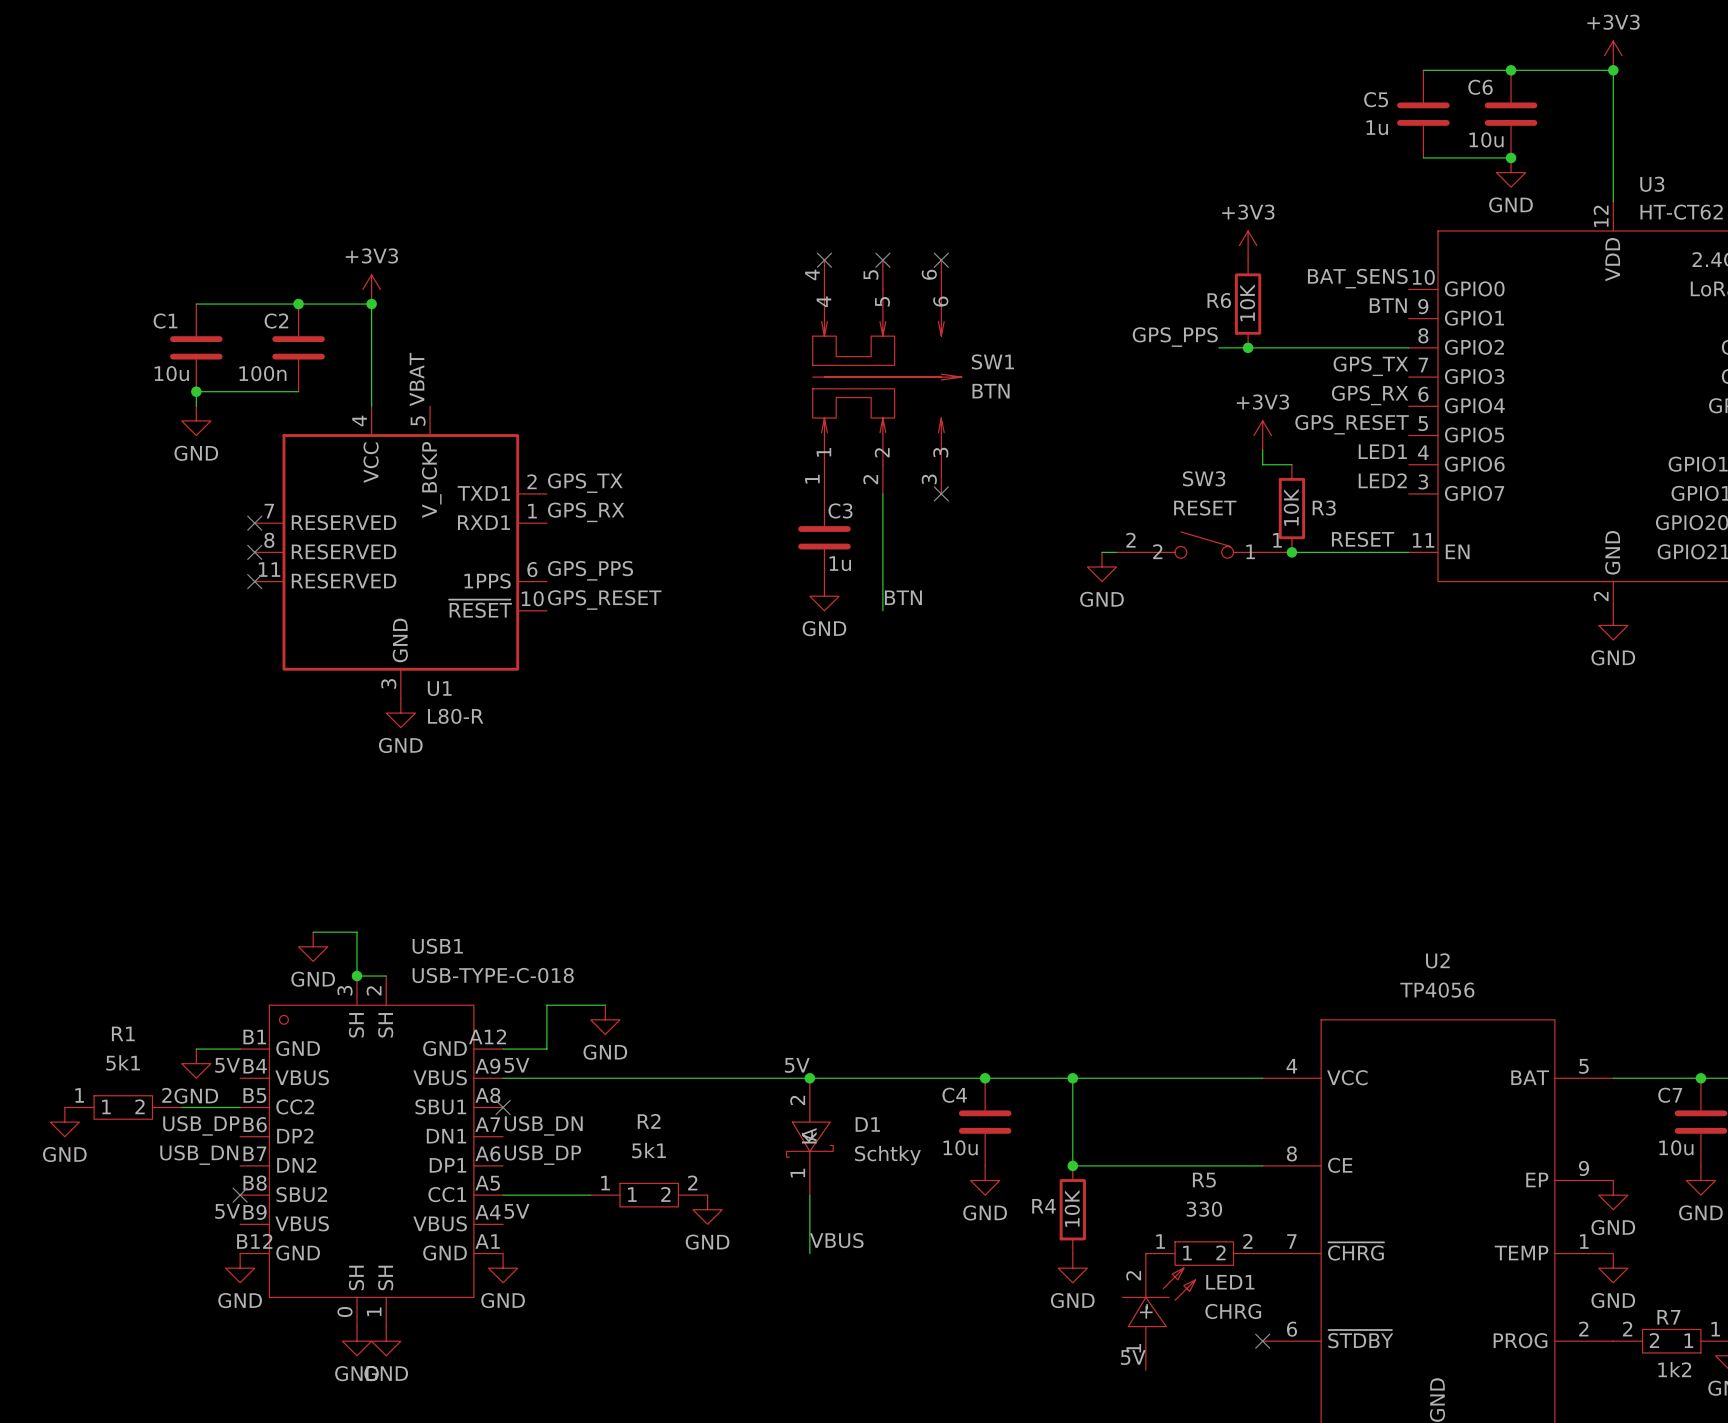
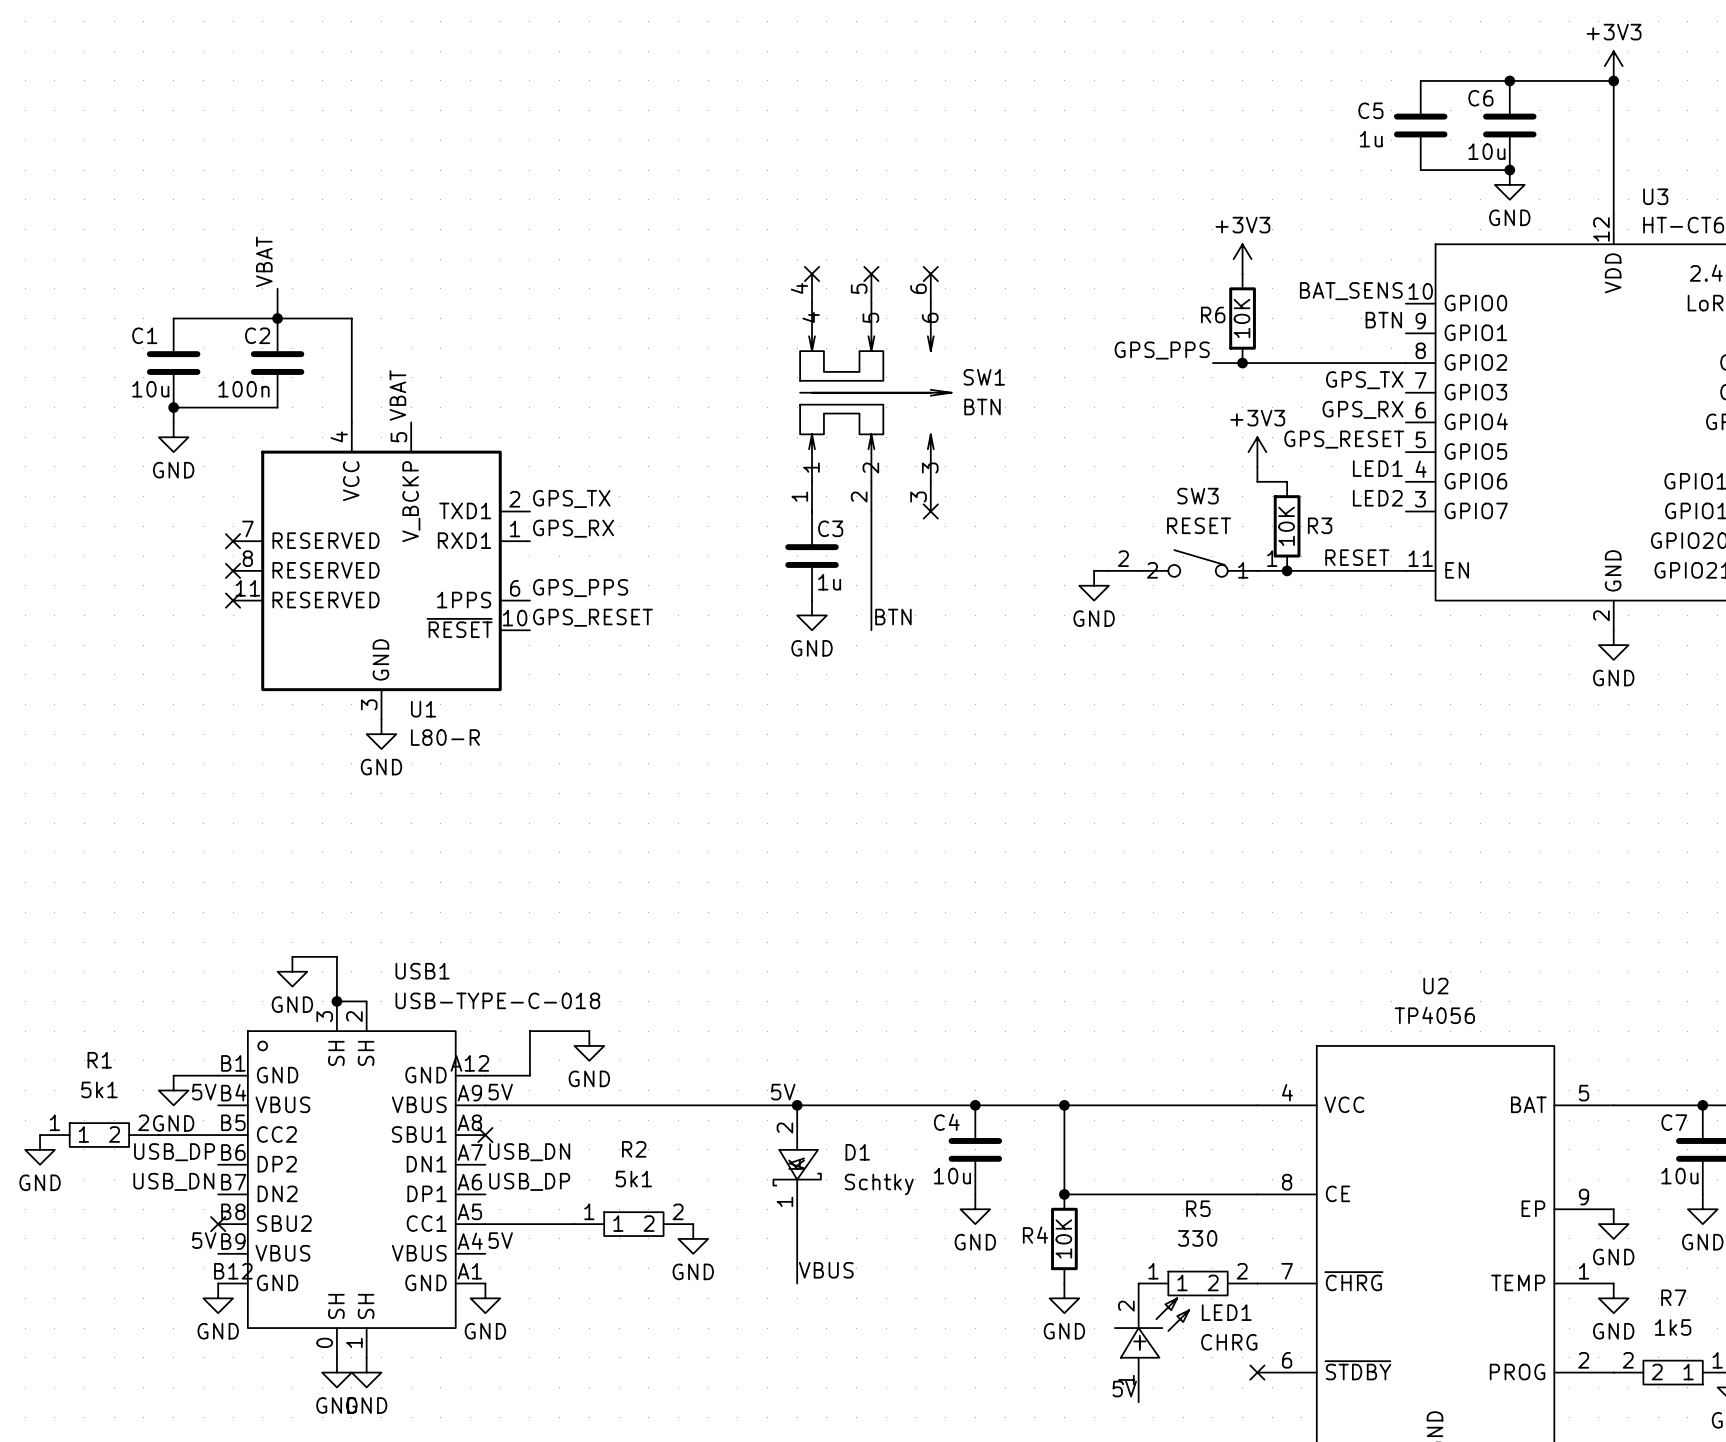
label: none -> VBAT (264, 261)
wire: none -> (277, 288) (277, 318)
power symbol: +3V3 (371, 289) -> none
junction: (371, 304) -> none
R7 name position: R7 (1668, 1317) -> R7 (1673, 1297)
R7 value: 1k2 (1674, 1369) -> 1k5 (1673, 1327)

